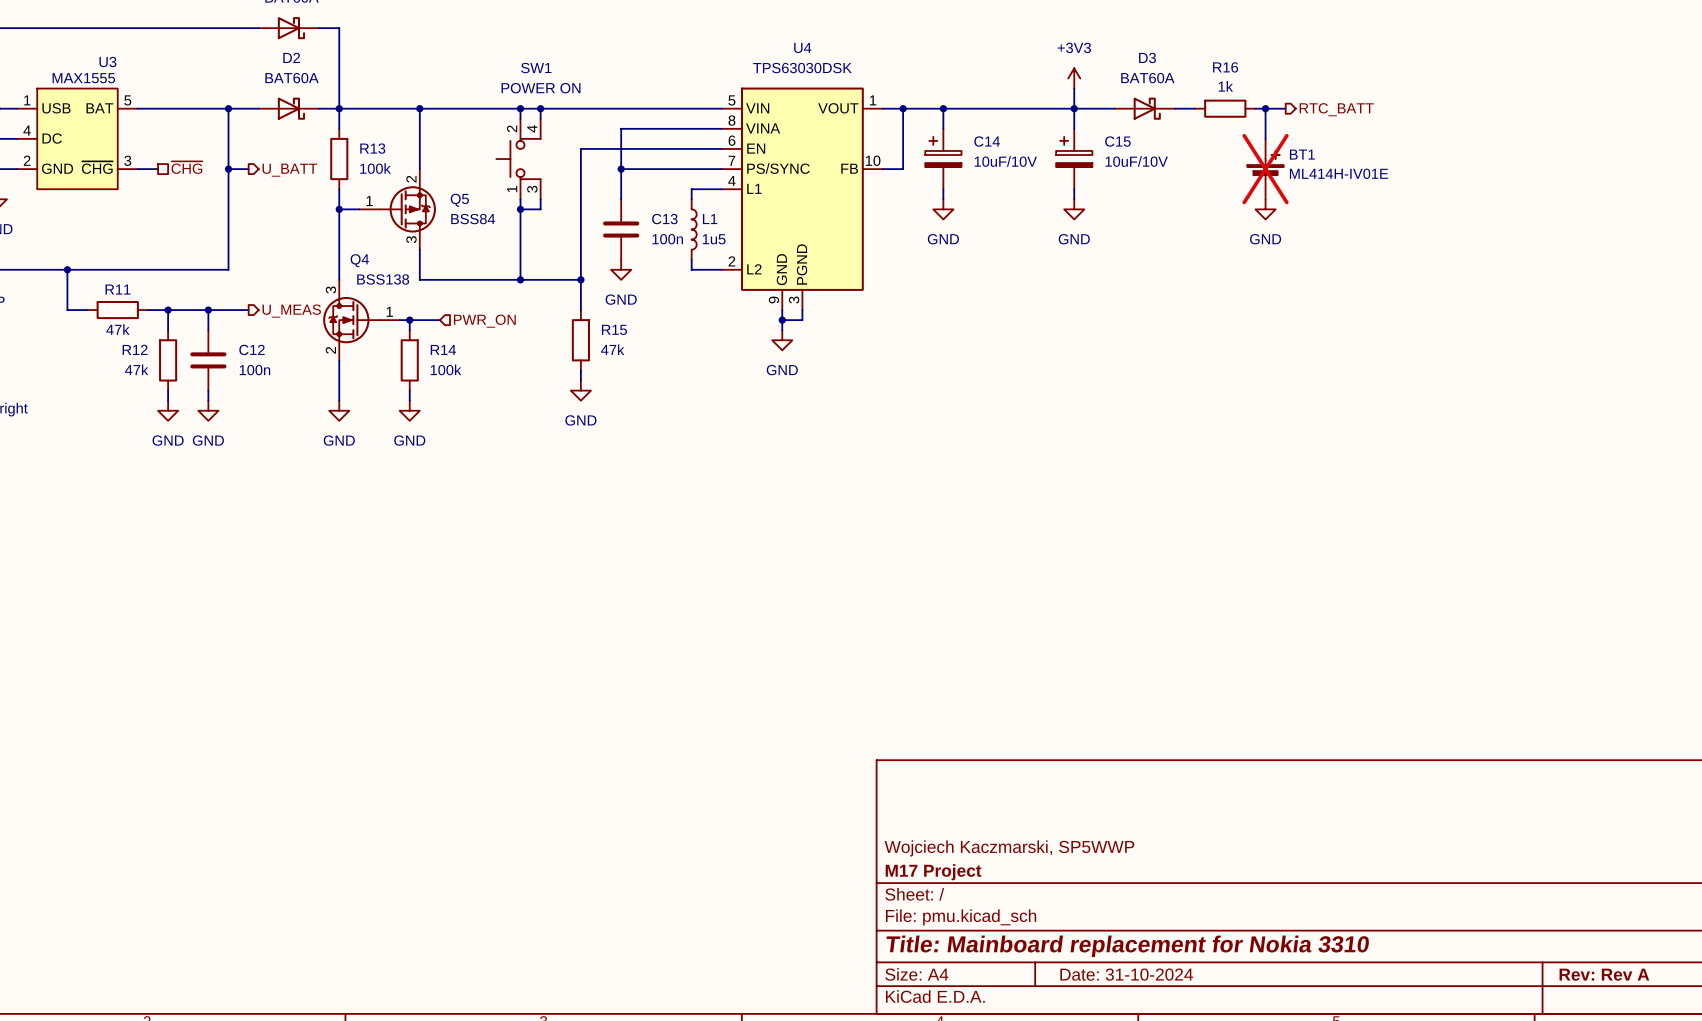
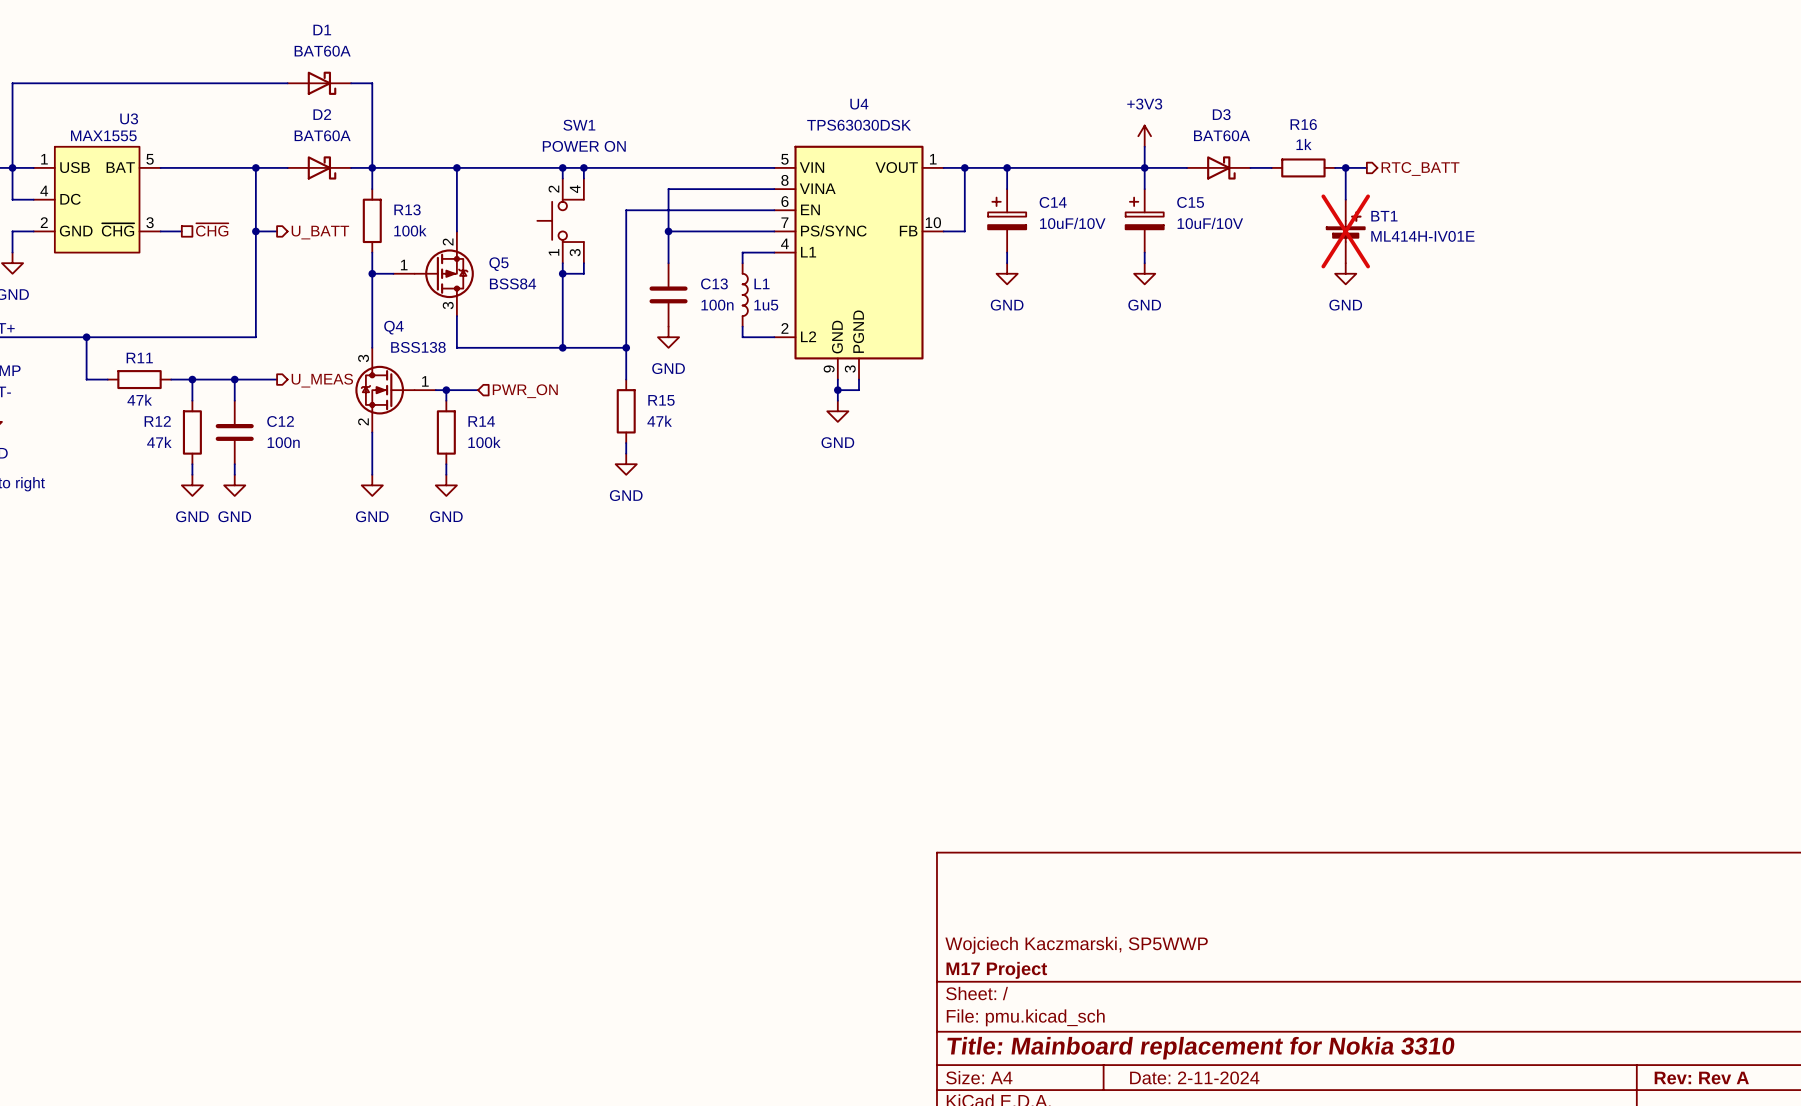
title block: Date: 31-10-2024 (1126, 974) -> Date: 2-11-2024 (1194, 1077)

